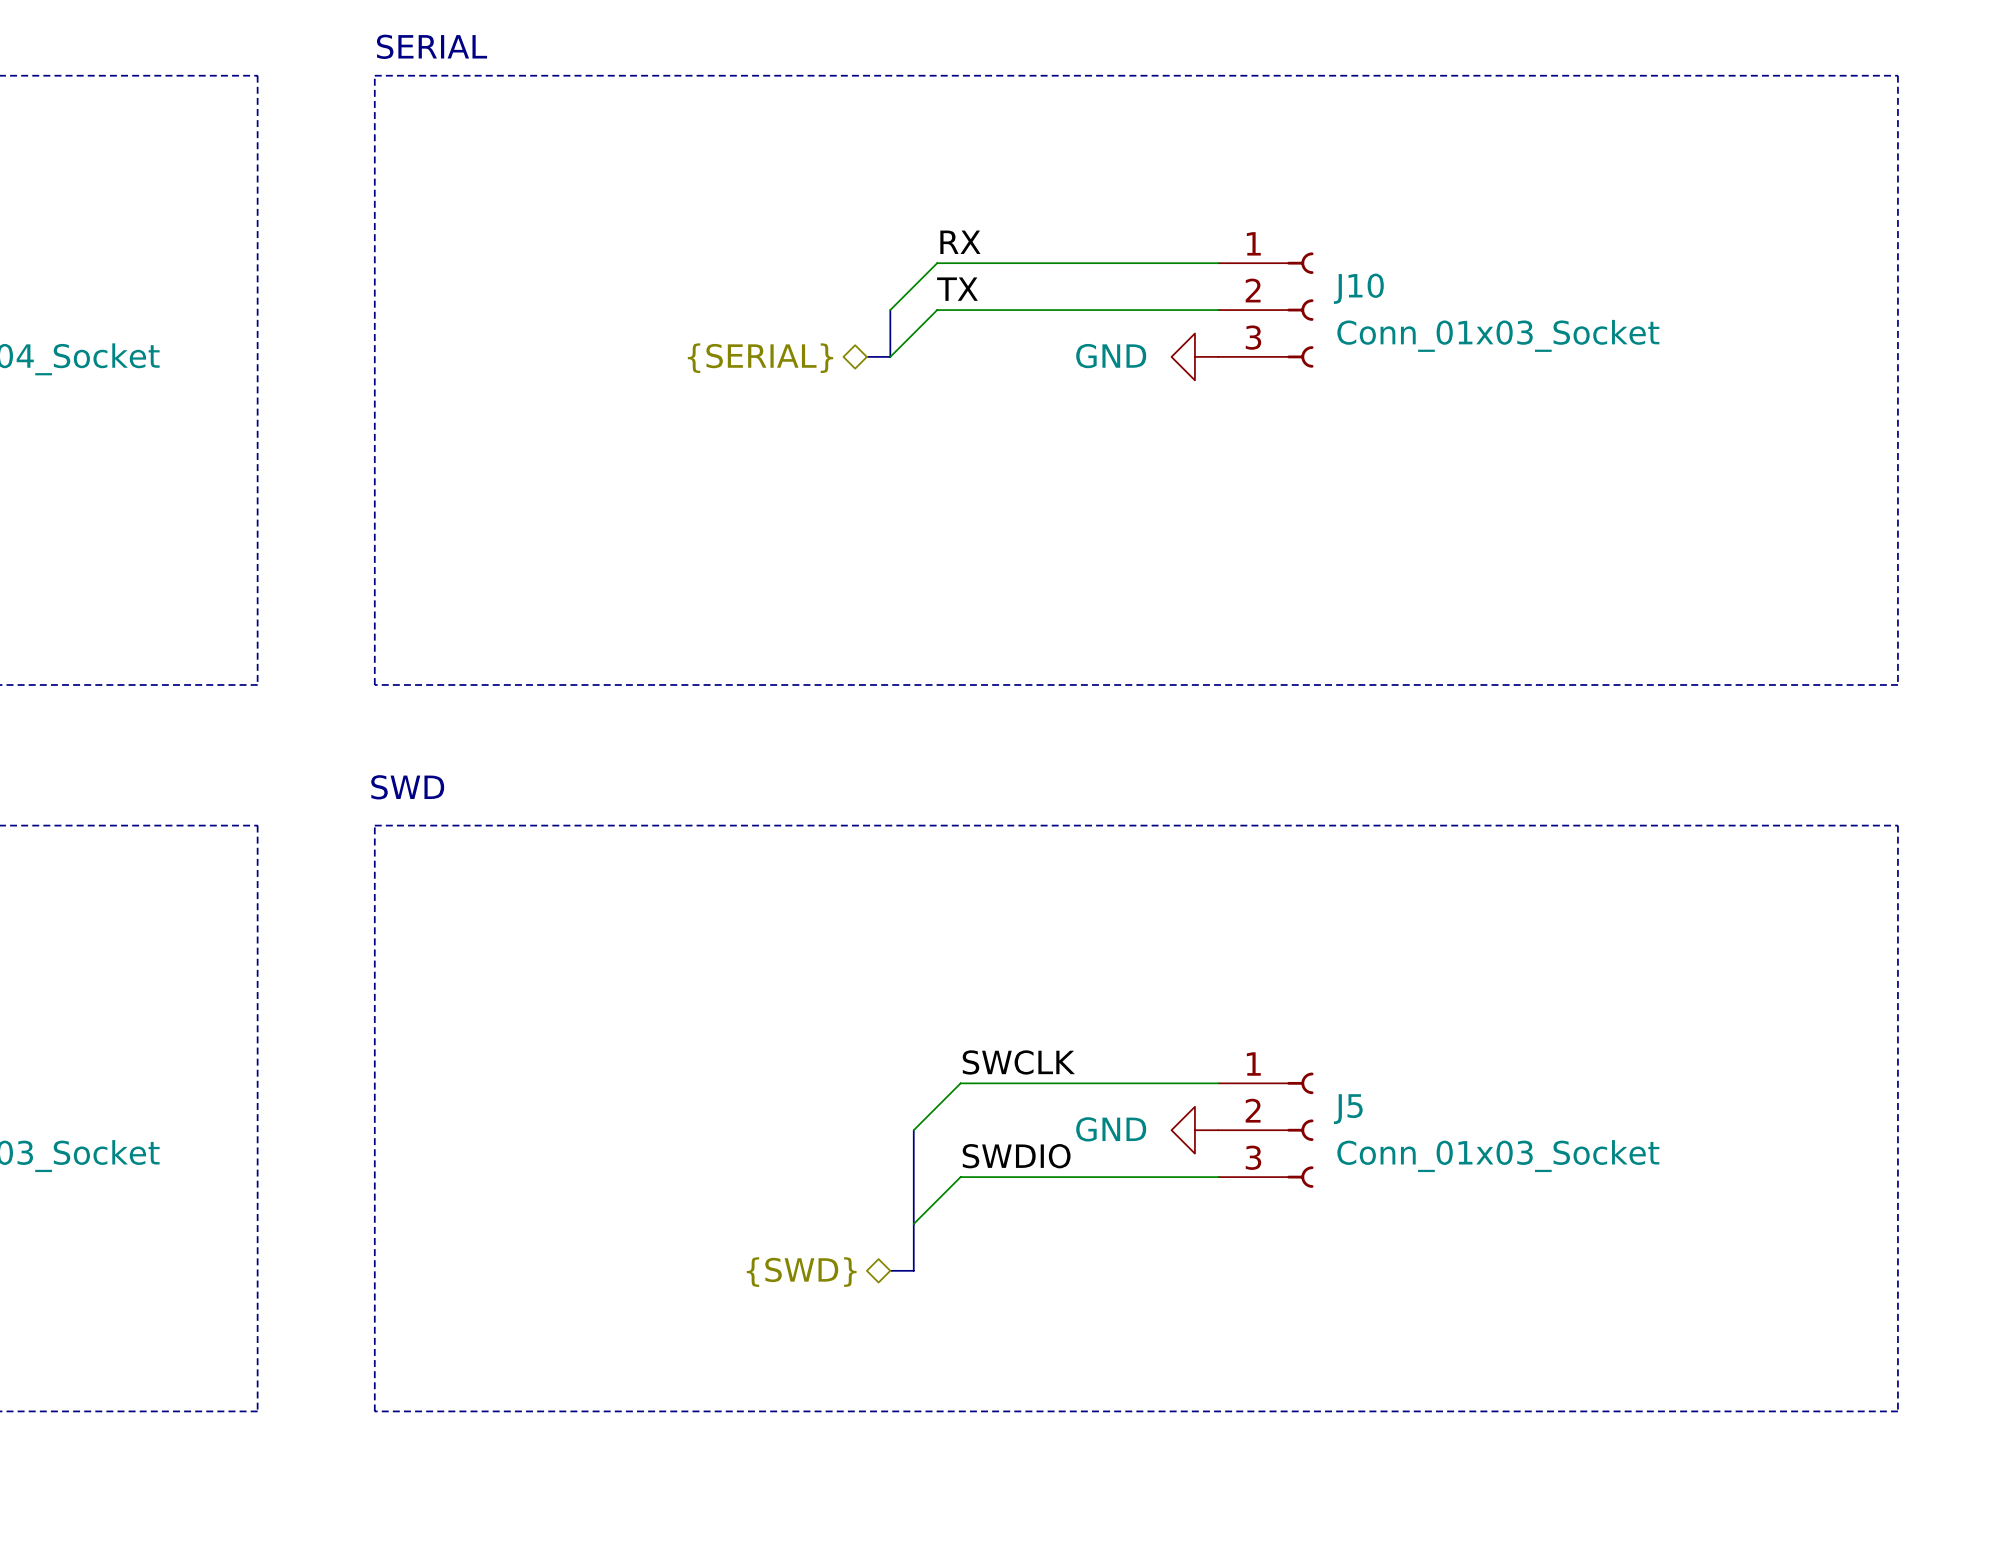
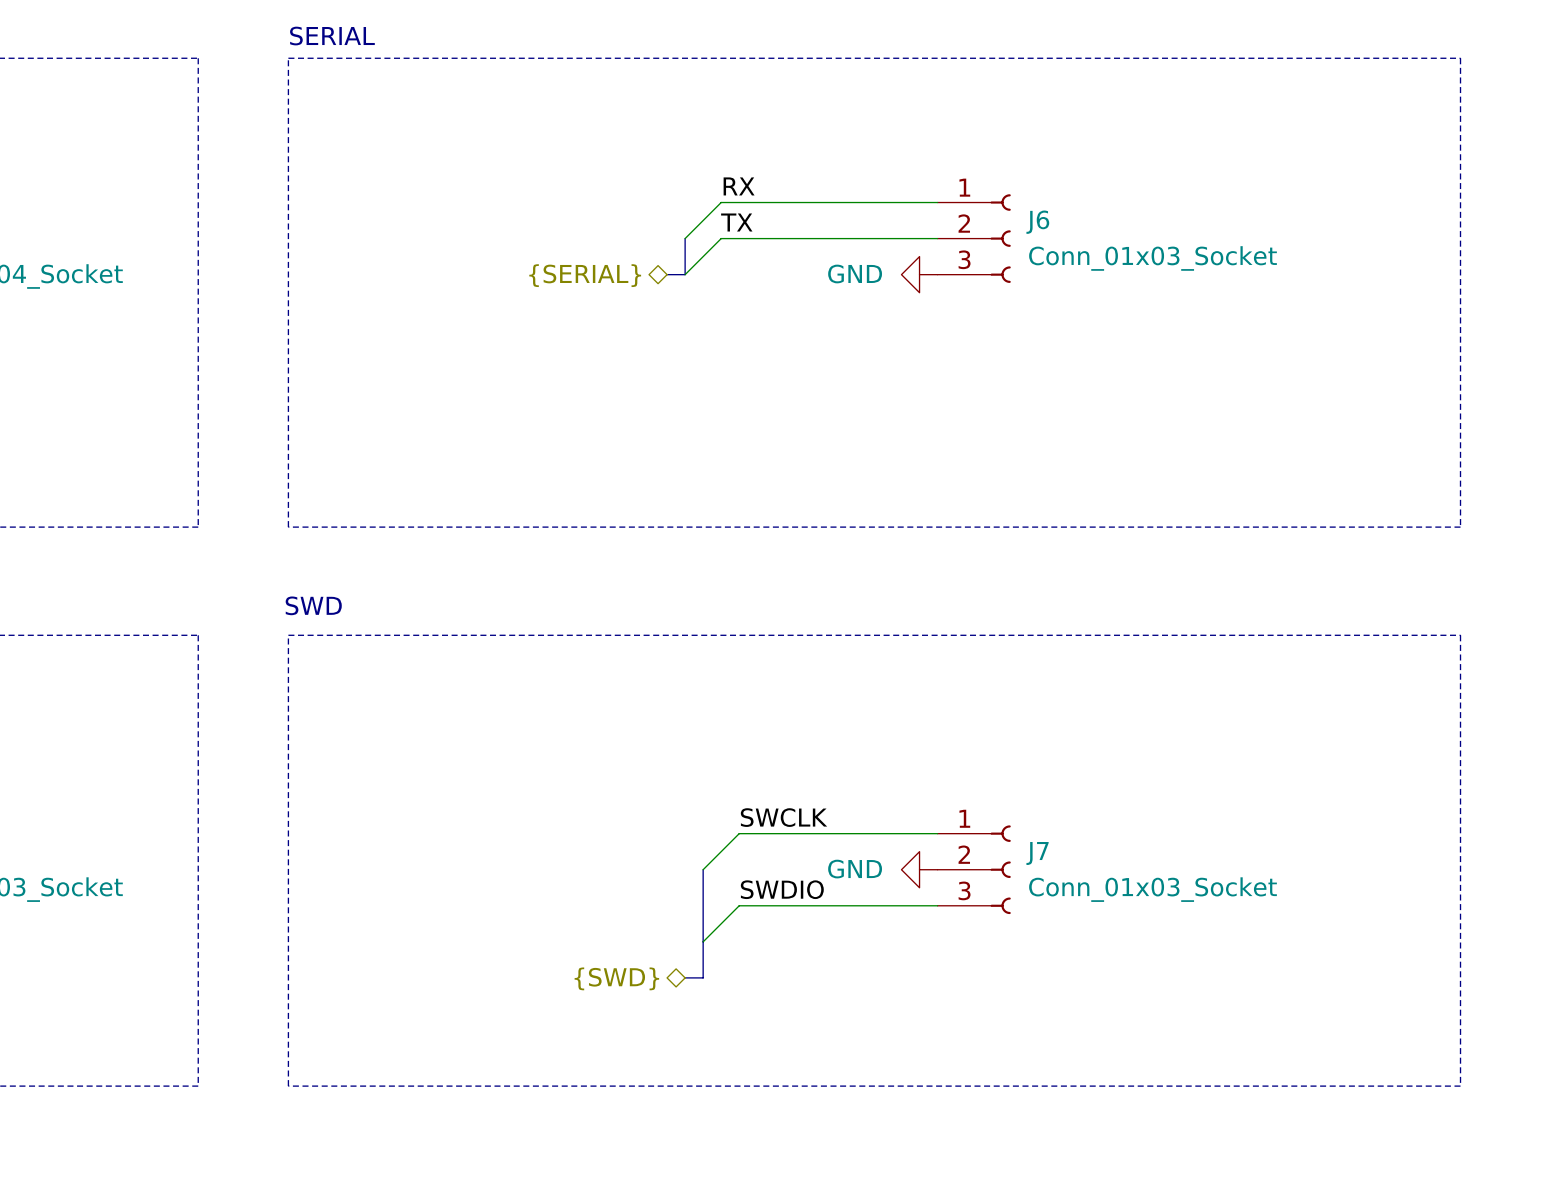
J10 name: J10 (1358, 288) -> J6 (1037, 222)
J5 name: J5 (1348, 1109) -> J7 (1037, 853)

